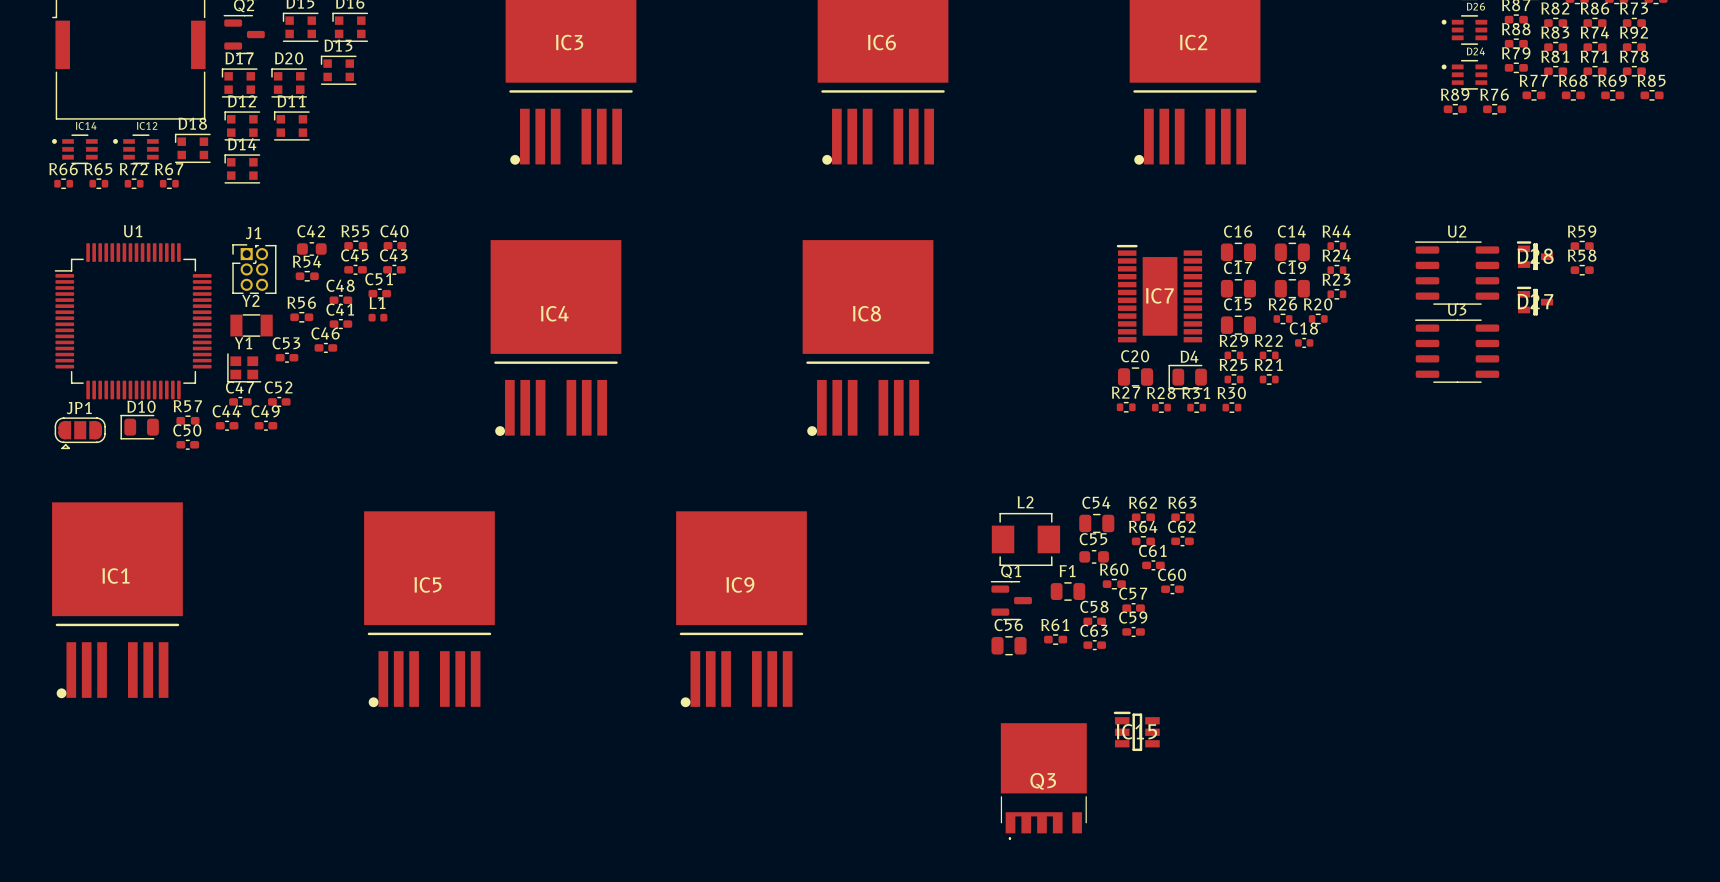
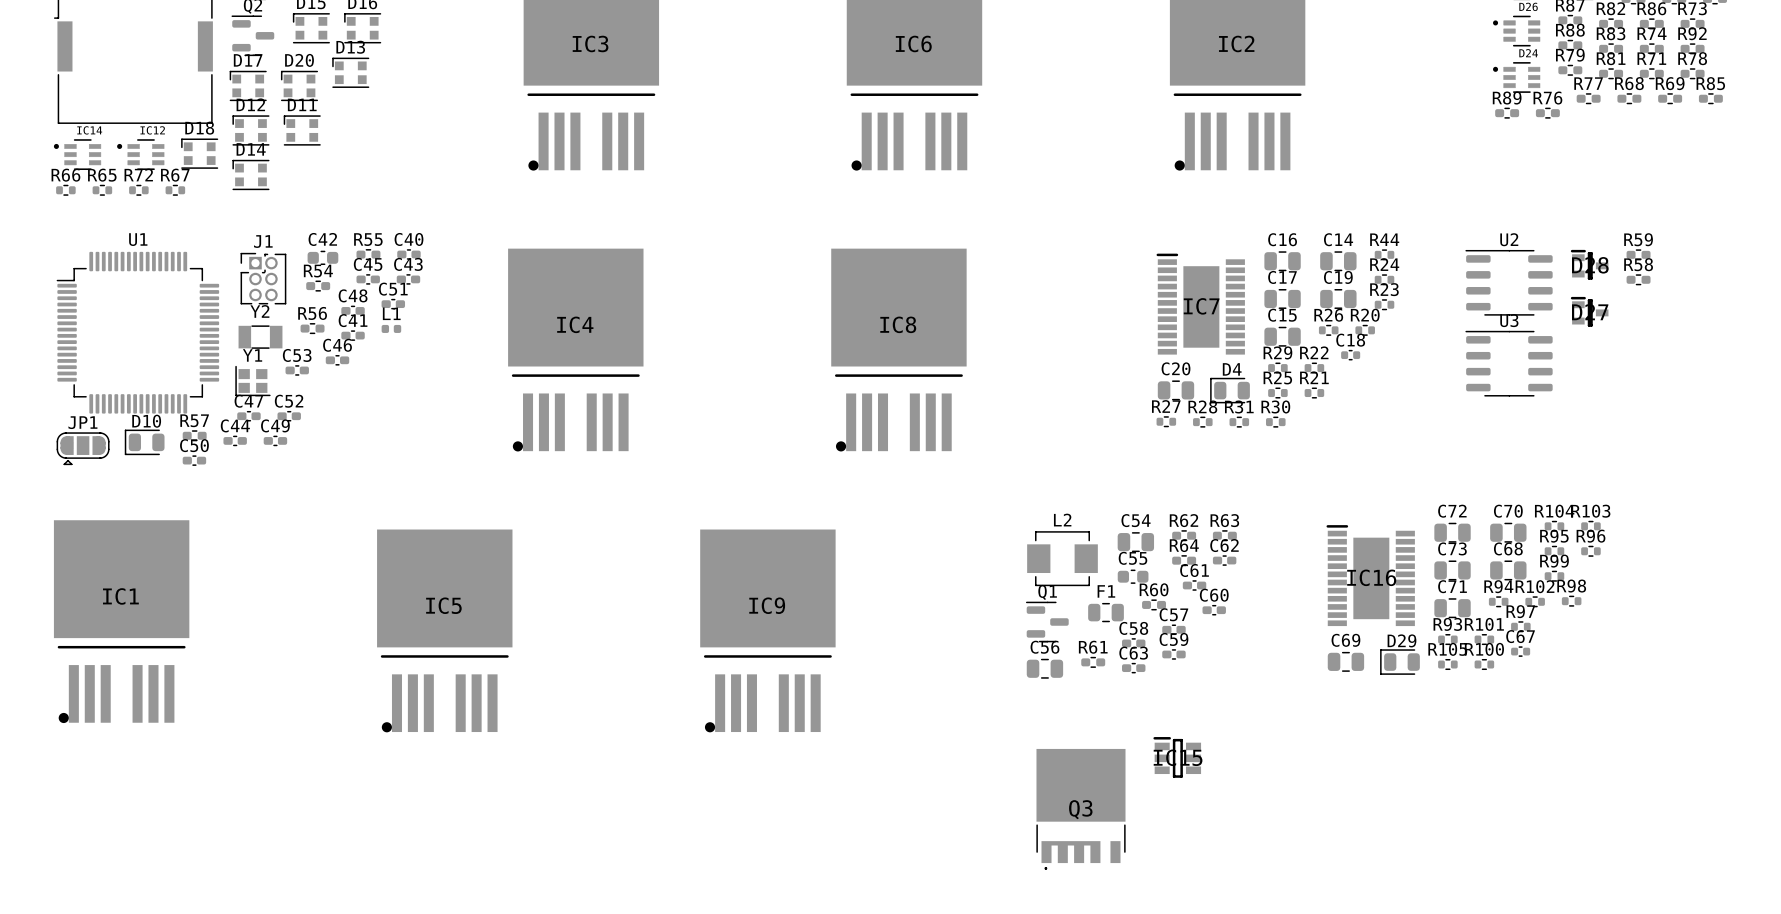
R104: none -> (1554, 526)
R103: none -> (1590, 526)
C72: none -> (1452, 532)
C70: none -> (1508, 532)
R95: none -> (1554, 551)
R96: none -> (1590, 551)
C73: none -> (1452, 570)
C68: none -> (1508, 570)
IC16: none -> (1370, 575)
R99: none -> (1554, 576)
R98: none -> (1571, 601)
R94: none -> (1498, 601)
R102: none -> (1535, 601)
C71: none -> (1452, 608)
R97: none -> (1520, 626)
R93: none -> (1447, 639)
R101: none -> (1484, 639)
C67: none -> (1520, 651)
C69: none -> (1345, 661)
D29: none -> (1399, 662)
R105: none -> (1447, 664)
R100: none -> (1484, 664)

